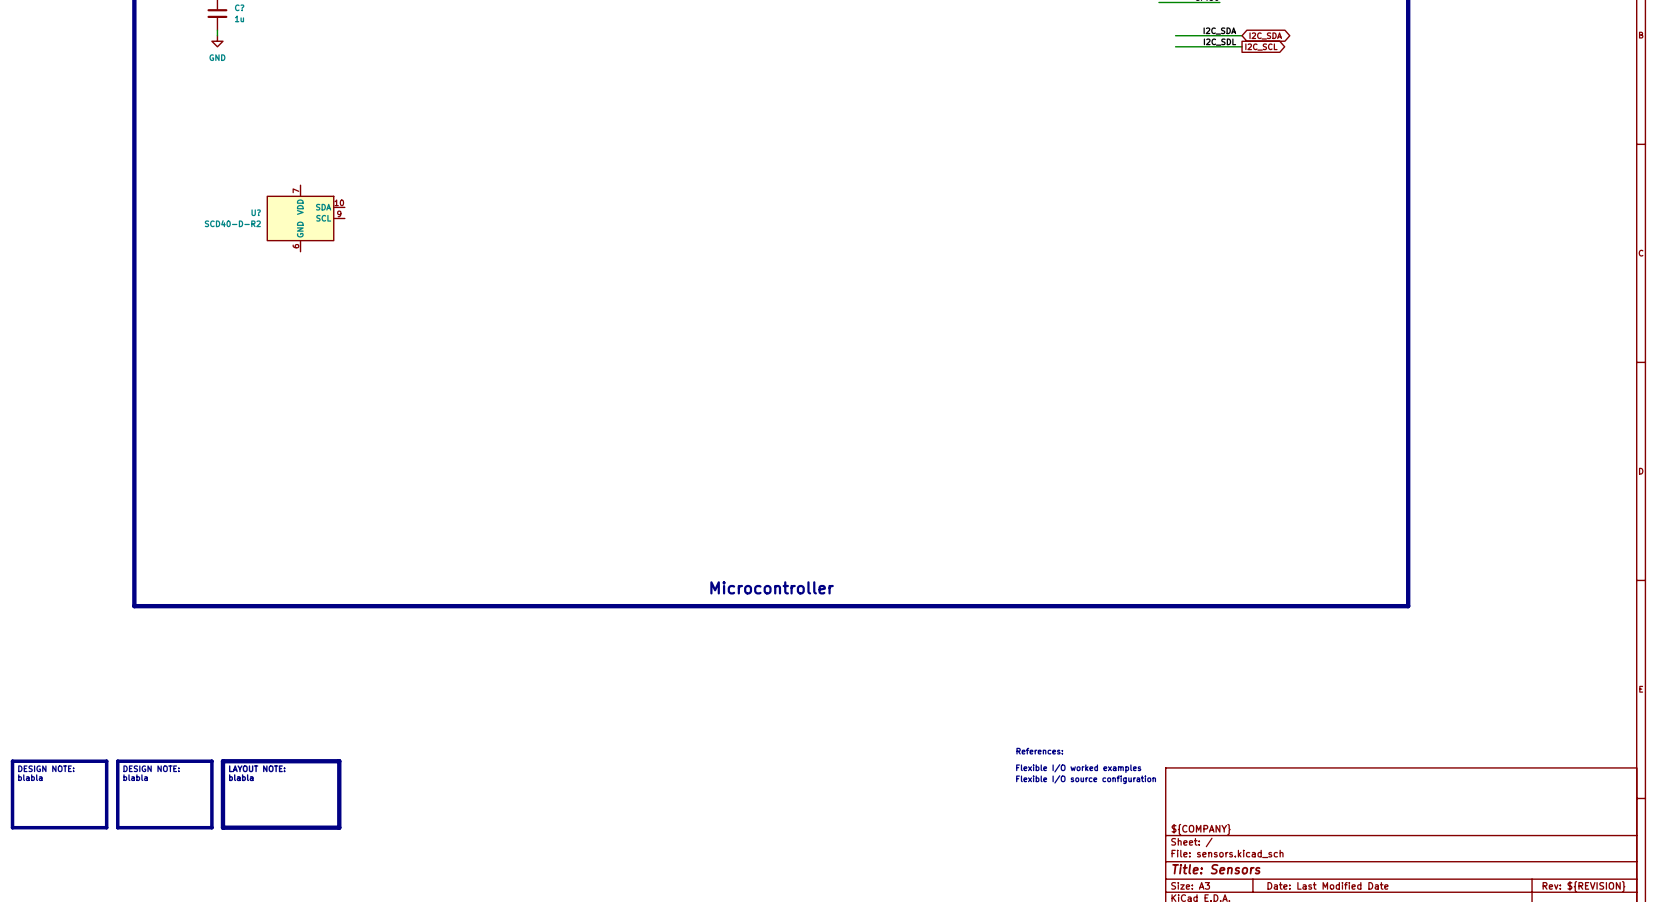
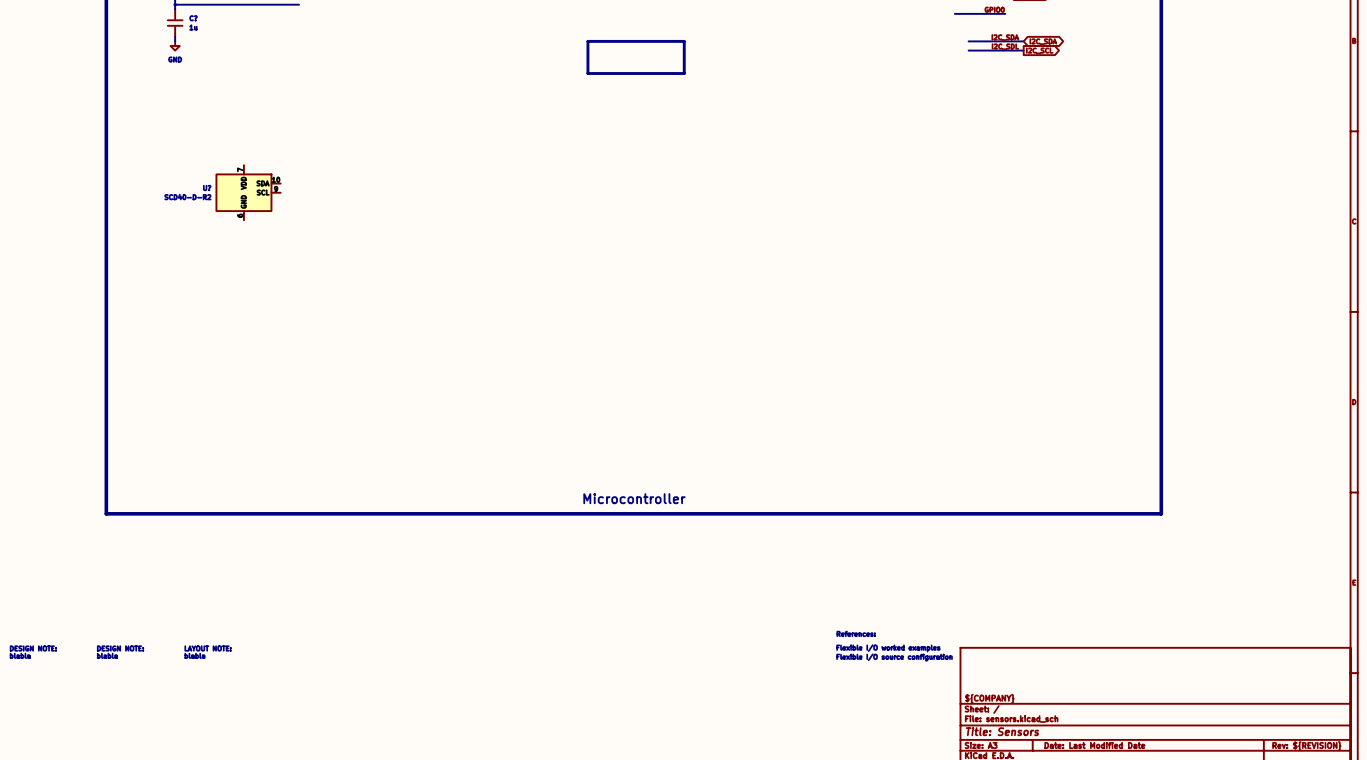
line: none -> (587, 41) (684, 41) (684, 73) (587, 73) (587, 41)
line: (12, 761) (106, 761) (106, 827) (12, 827) (12, 761) -> none
line: (117, 761) (211, 761) (211, 827) (117, 827) (117, 761) -> none
line: (222, 761) (339, 761) (339, 827) (222, 827) (222, 761) -> none

